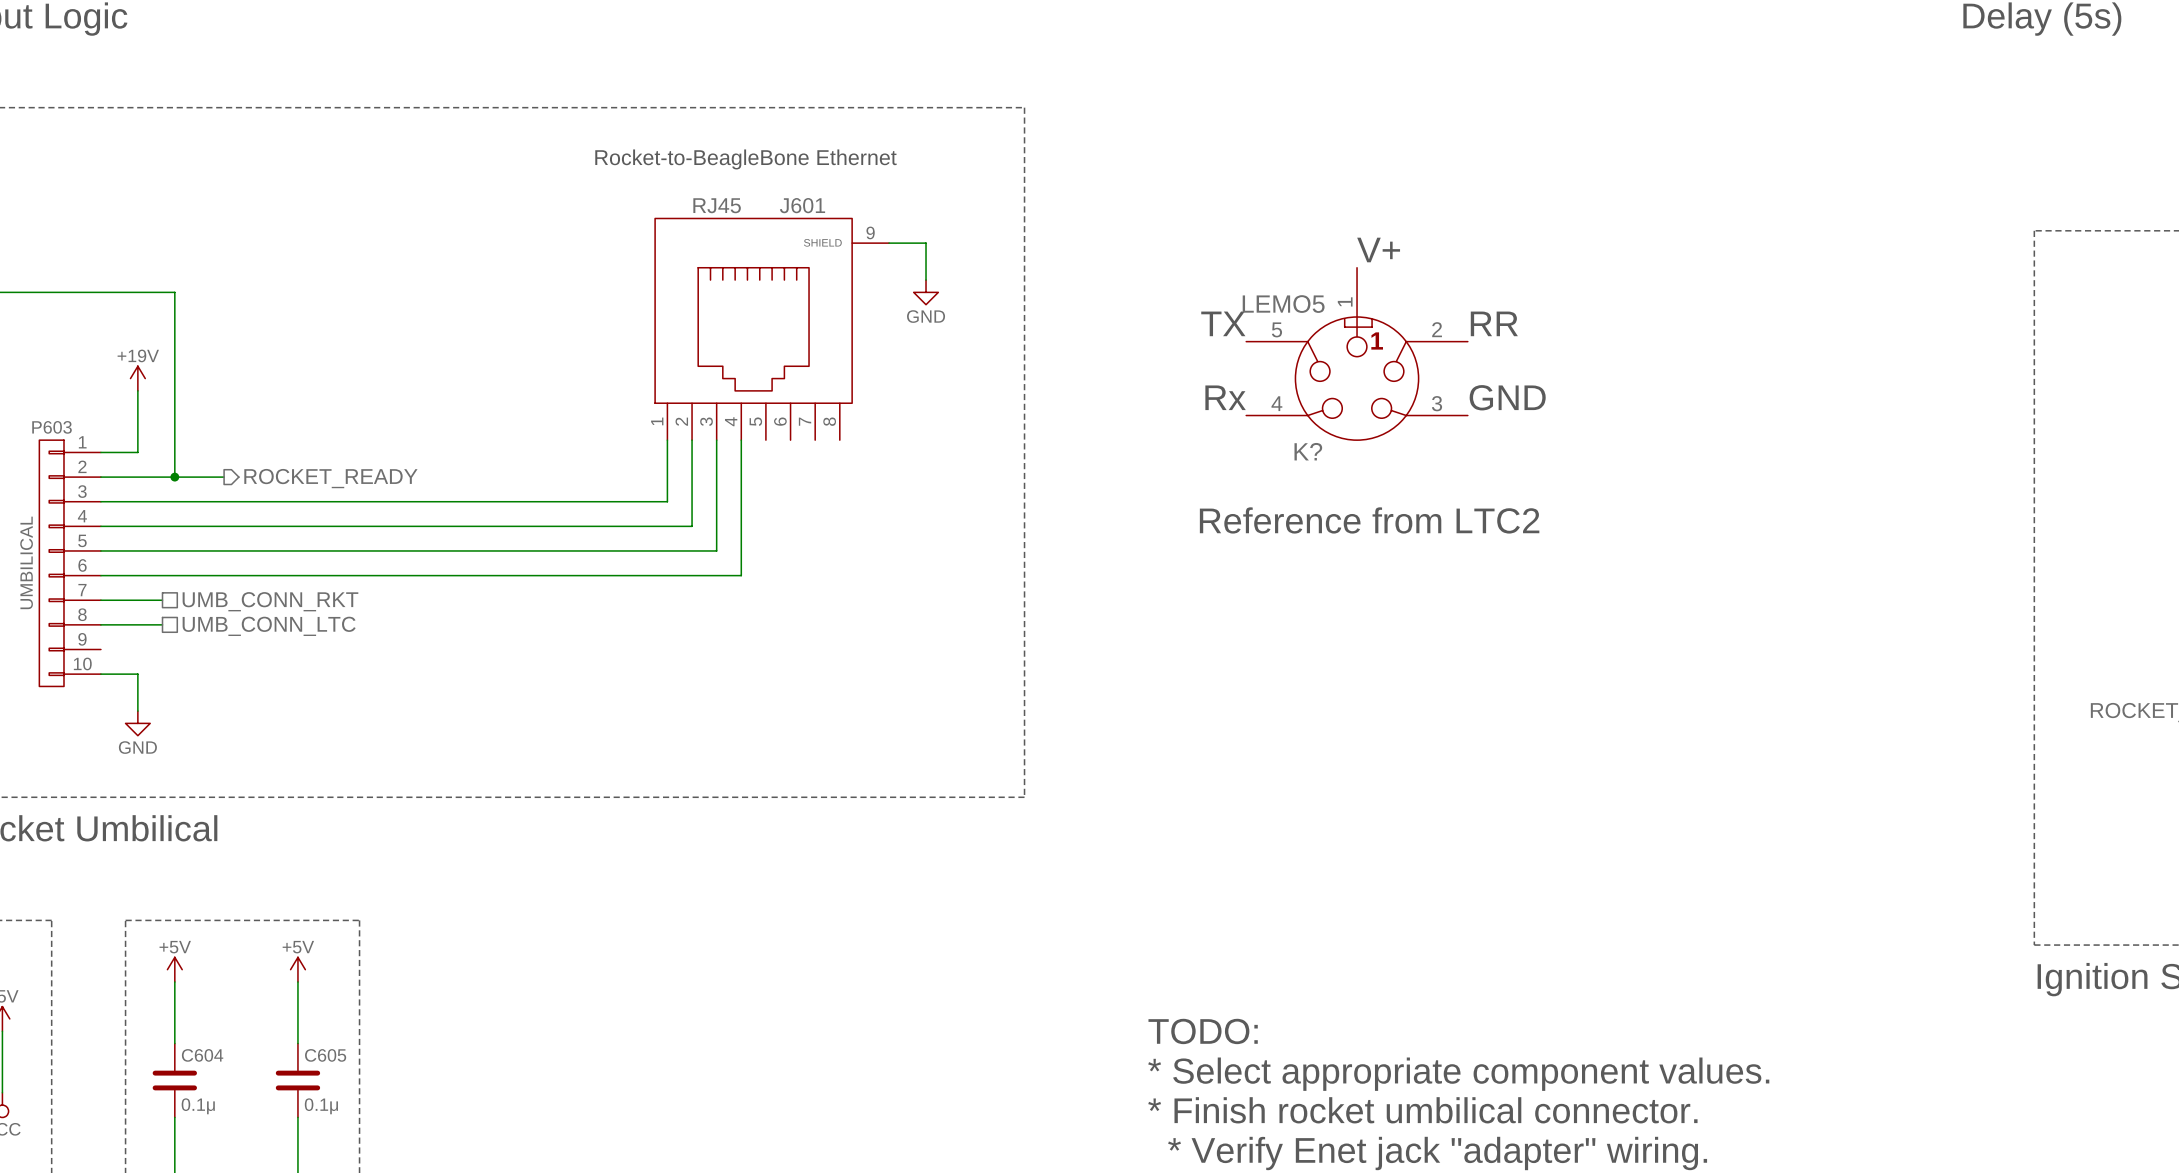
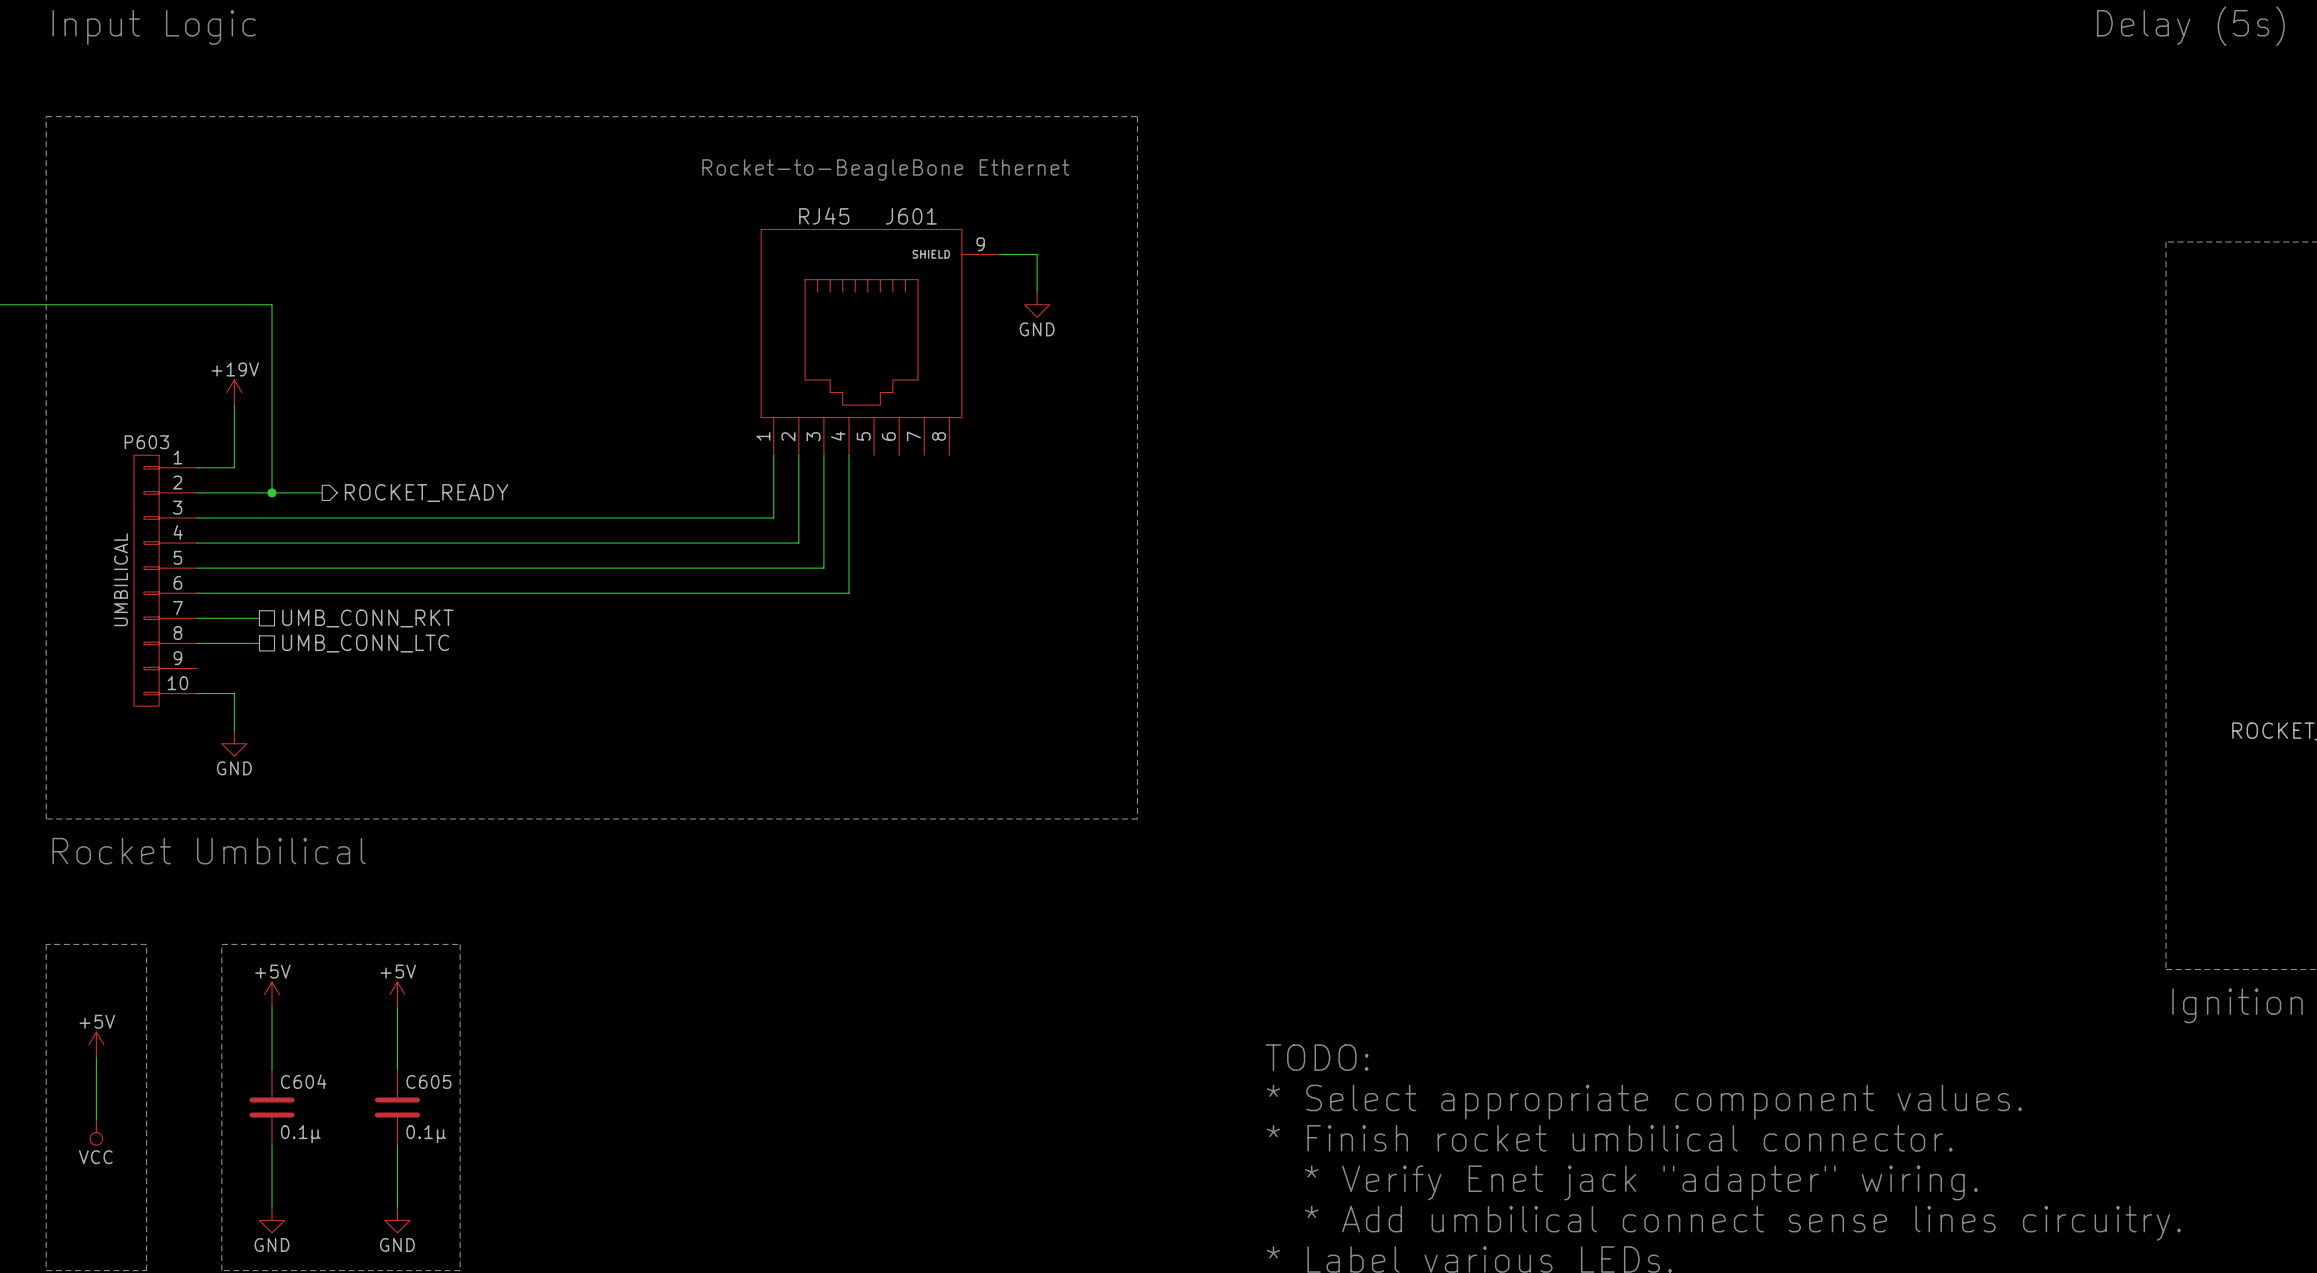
text: V+ (1378, 249) -> none
text: TX (1223, 323) -> none
text: RR (1494, 323) -> none
K?: LEMO5 (1357, 353) -> none
text: Rx (1225, 397) -> none
text: GND (1507, 397) -> none
text: Reference from LTC2 (1369, 520) -> none

